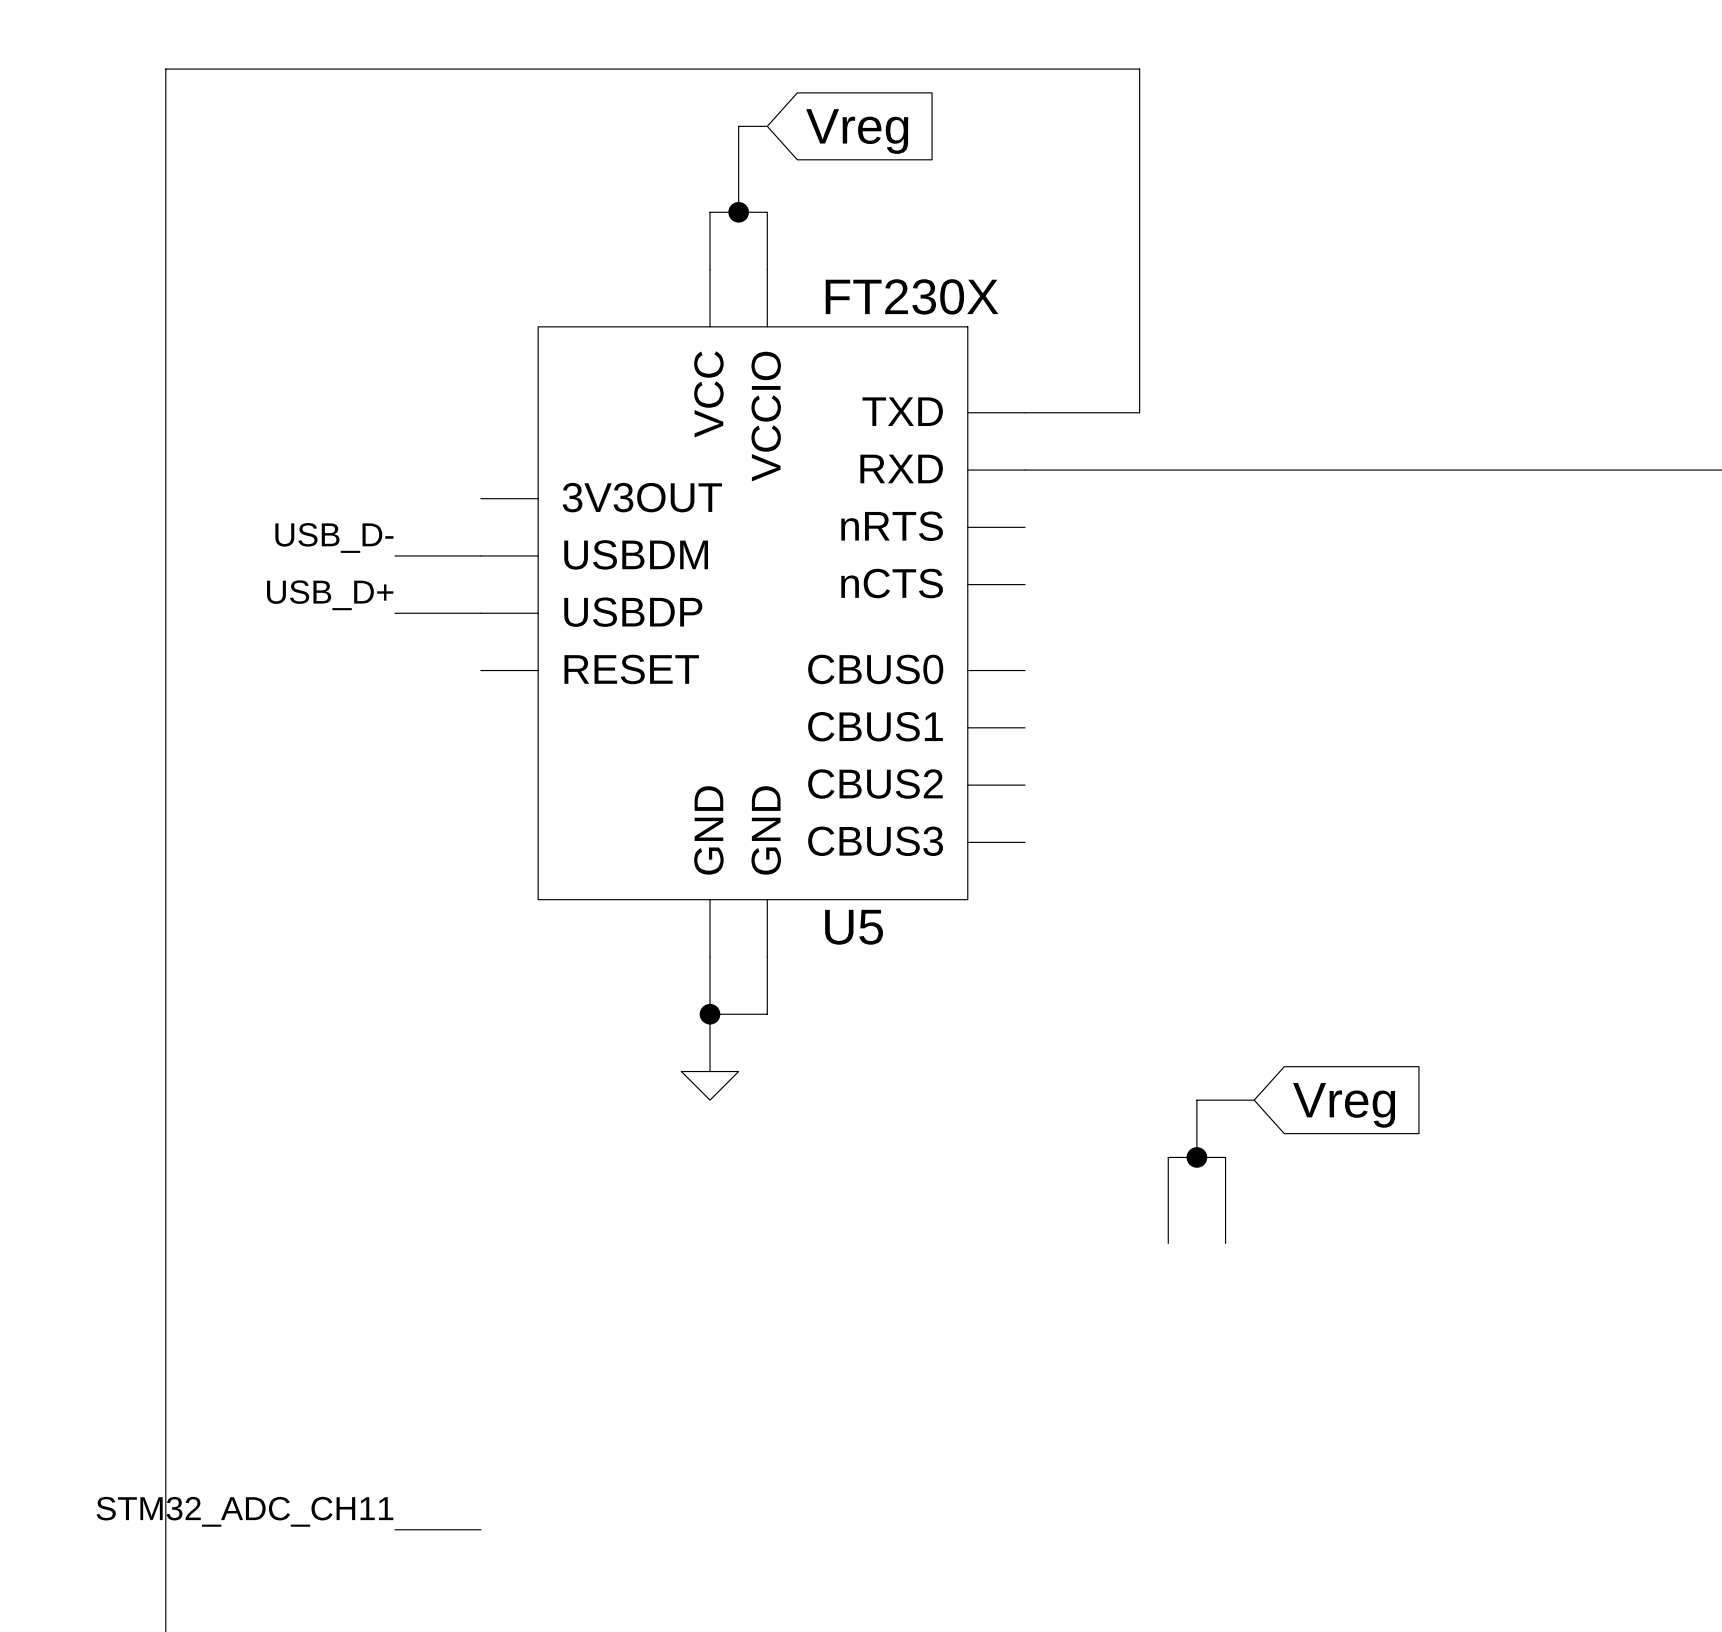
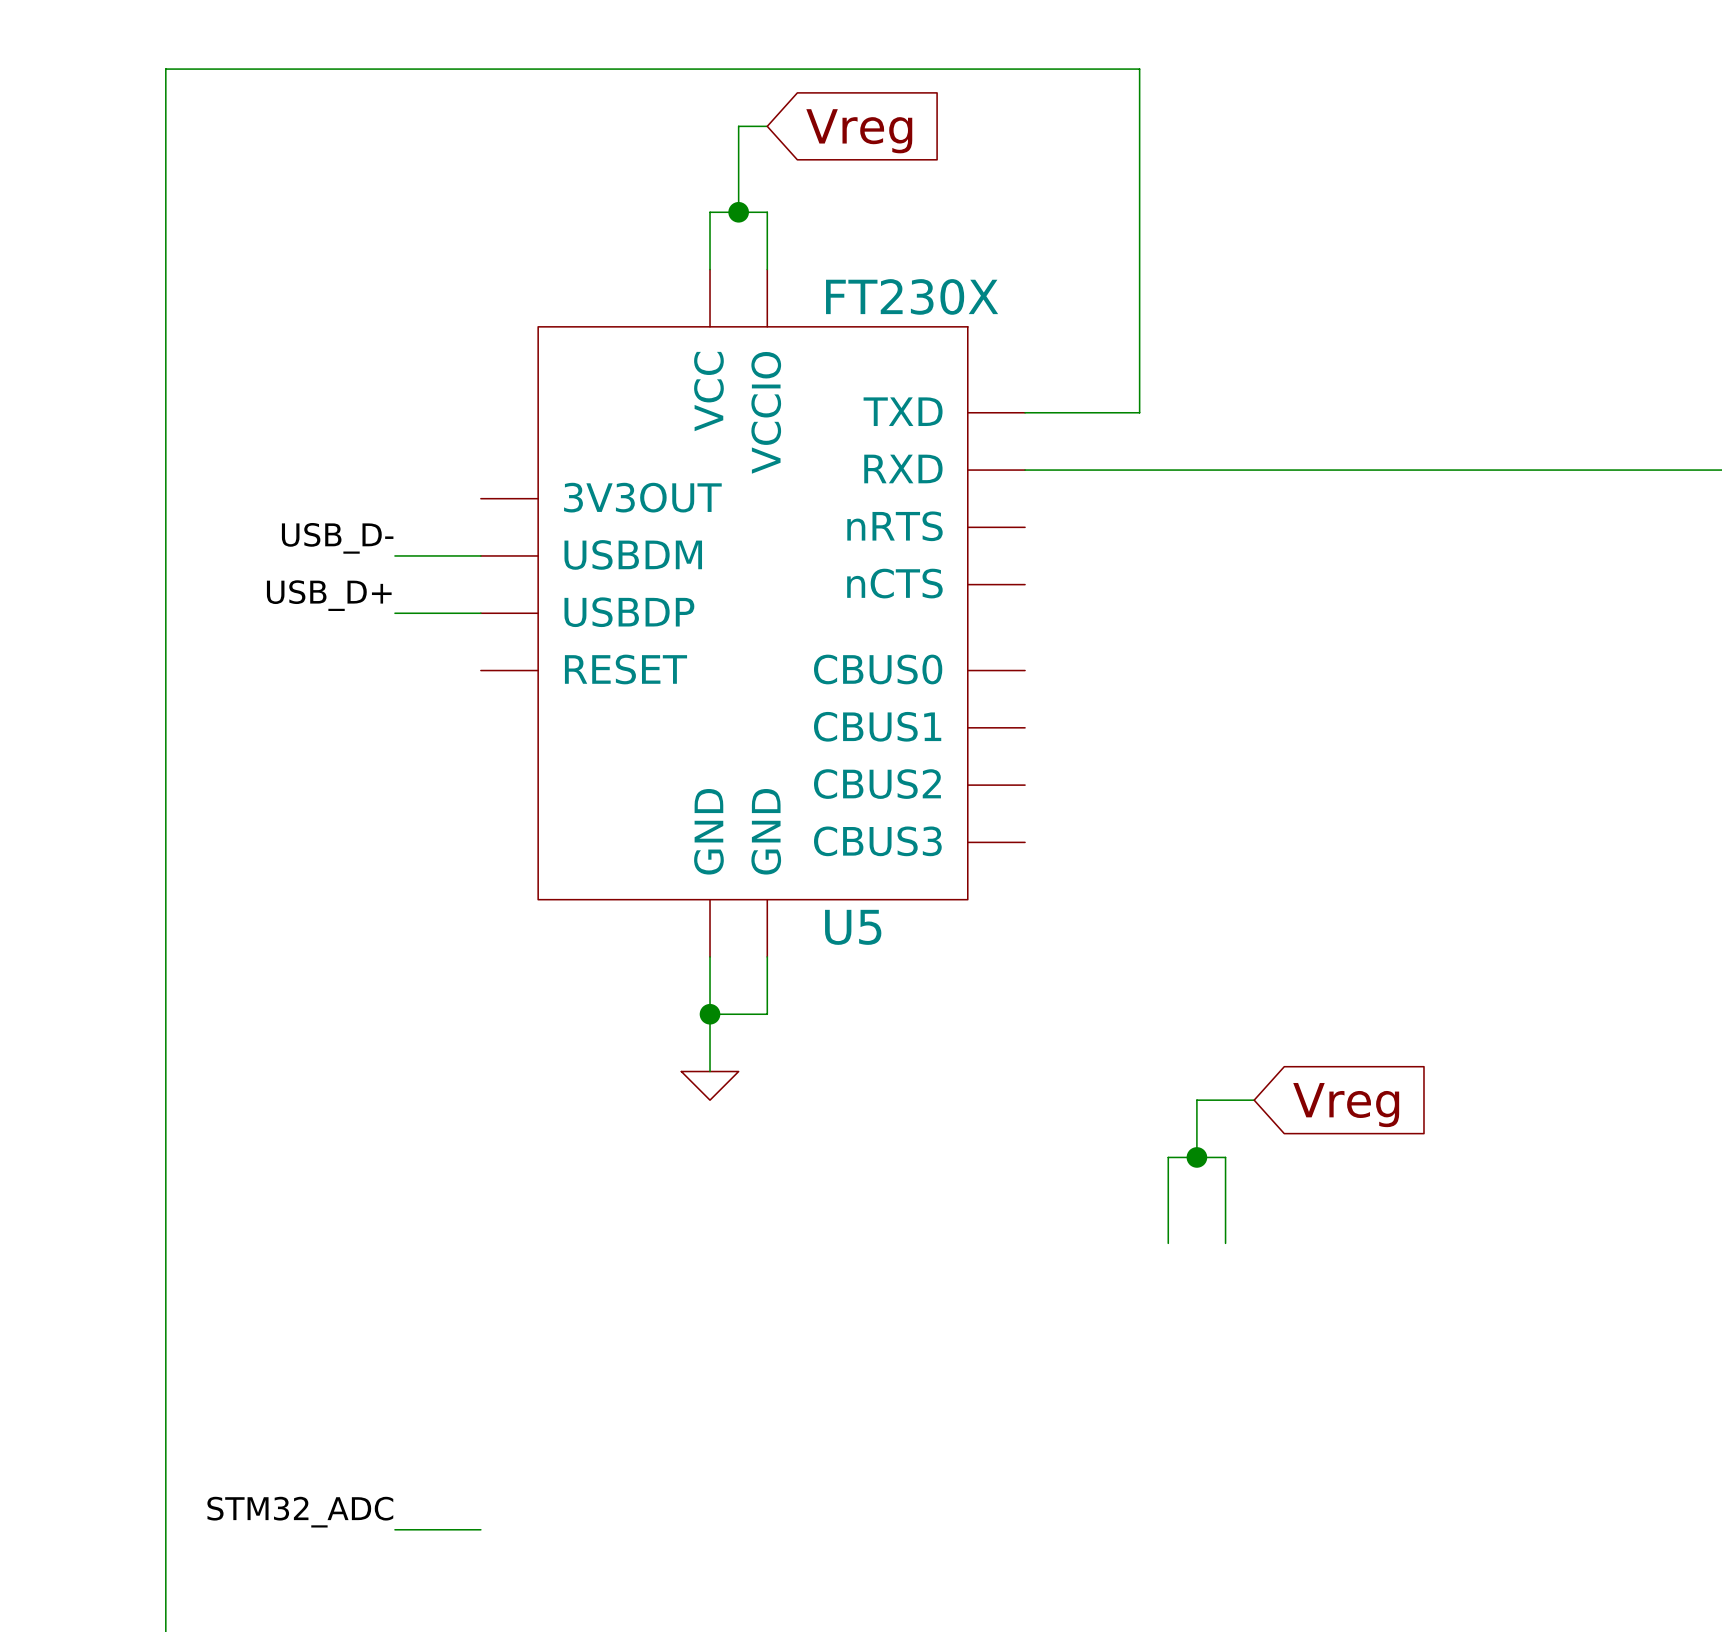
label: STM32_ADC_CH11 (244, 1511) -> STM32_ADC (300, 1512)

